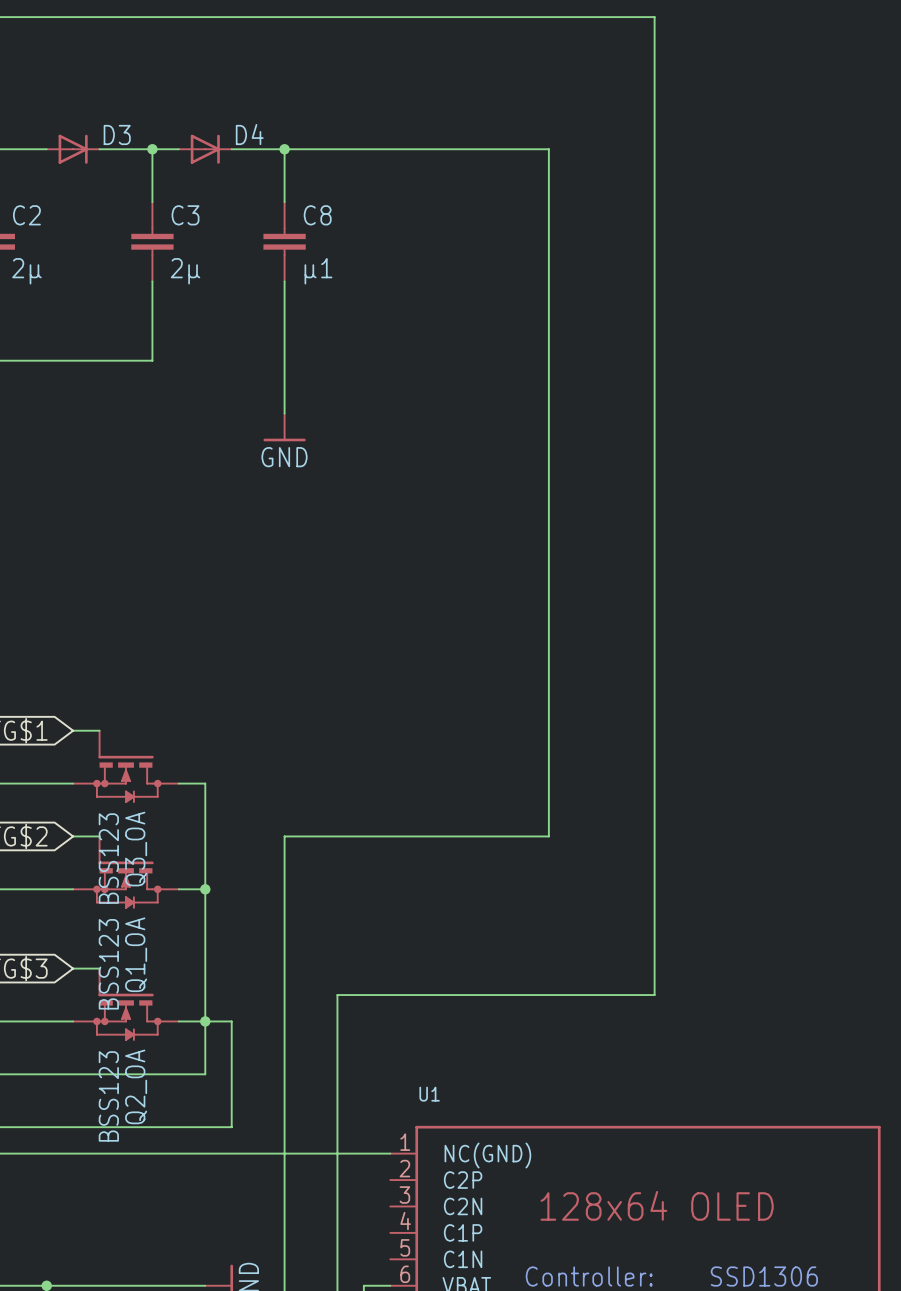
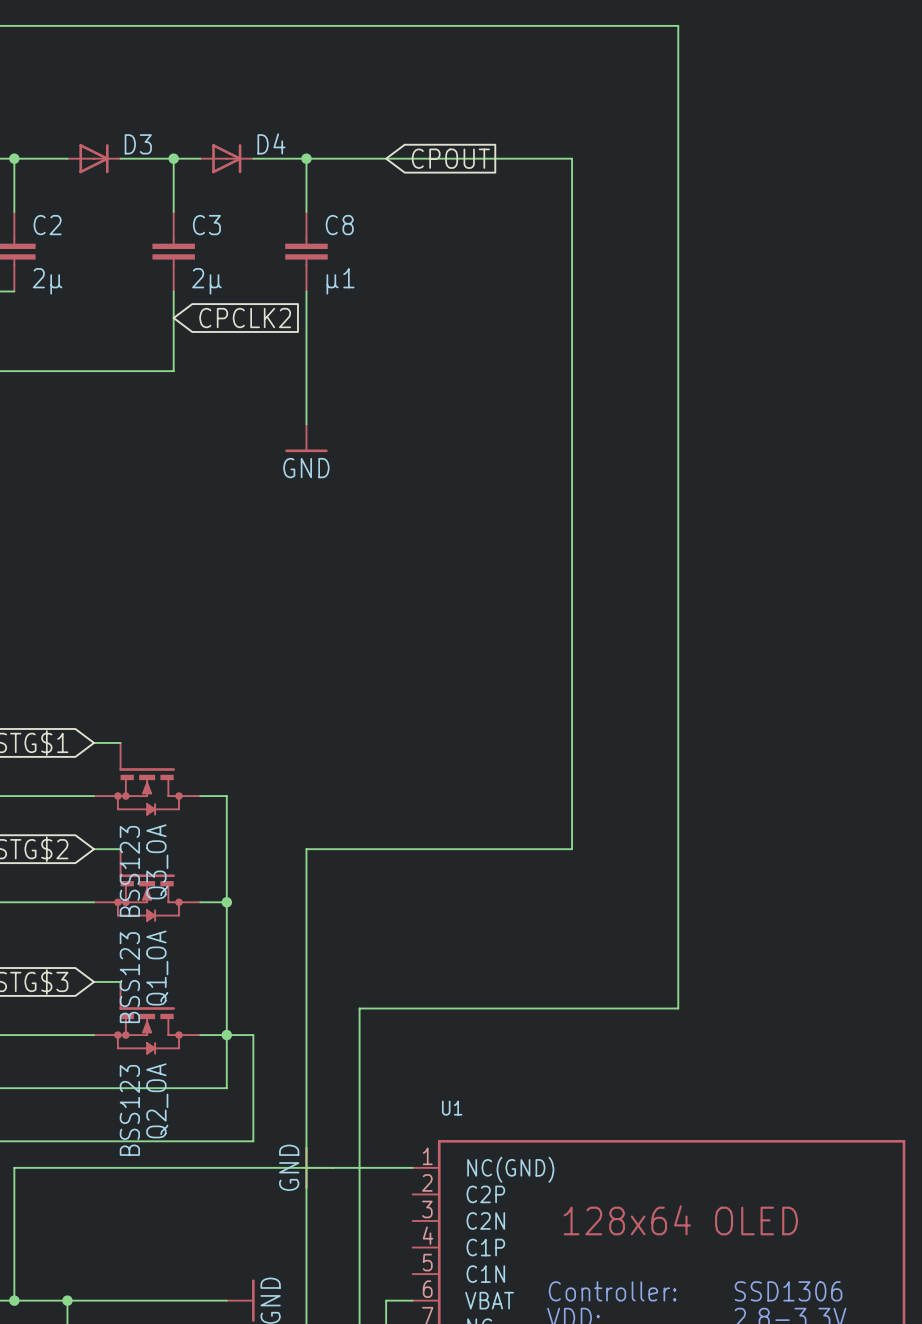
global label: none -> CPOUT (450, 158)
global label: none -> CPCLK2 (245, 318)
power symbol: none -> GND (319, 1167)

